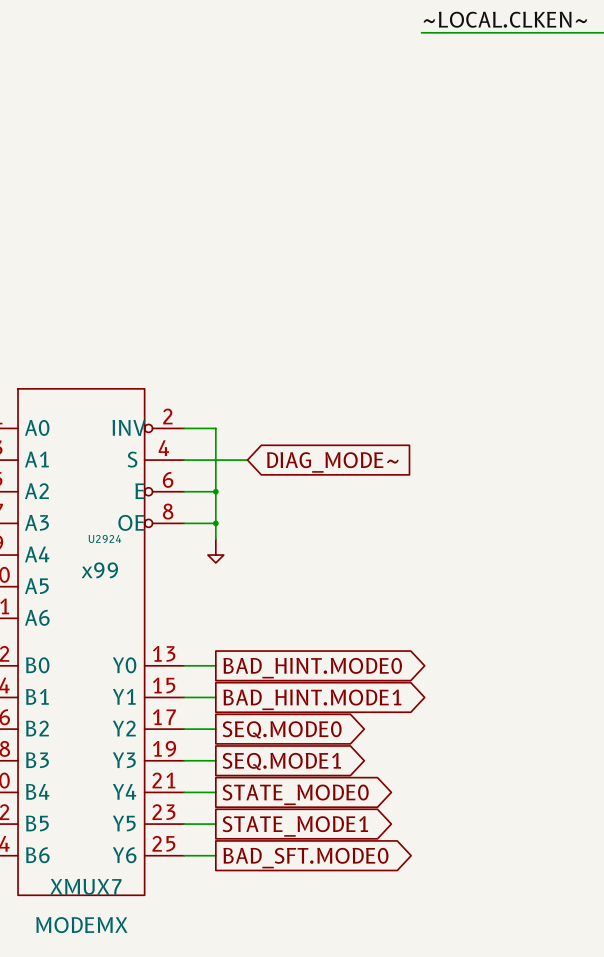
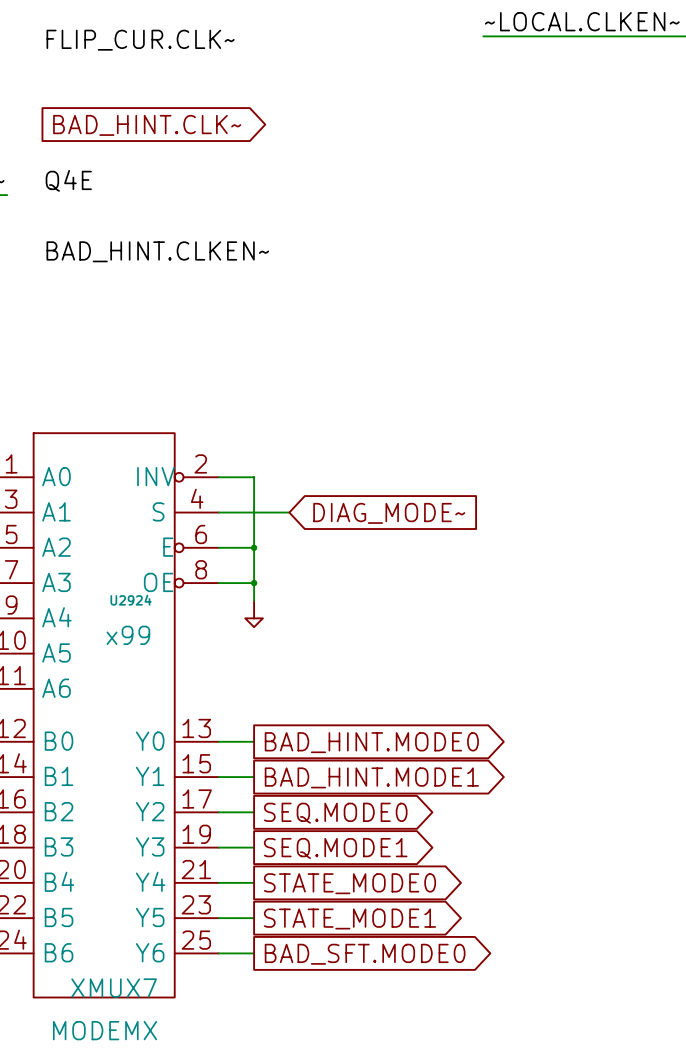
label: none -> FLIP_CUR.CLK~ (140, 40)
global label: none -> BAD_HINT.CLK~ (147, 125)
label: none -> Q4E (68, 180)
label: none -> BAD_HINT.CLKEN~ (157, 251)

